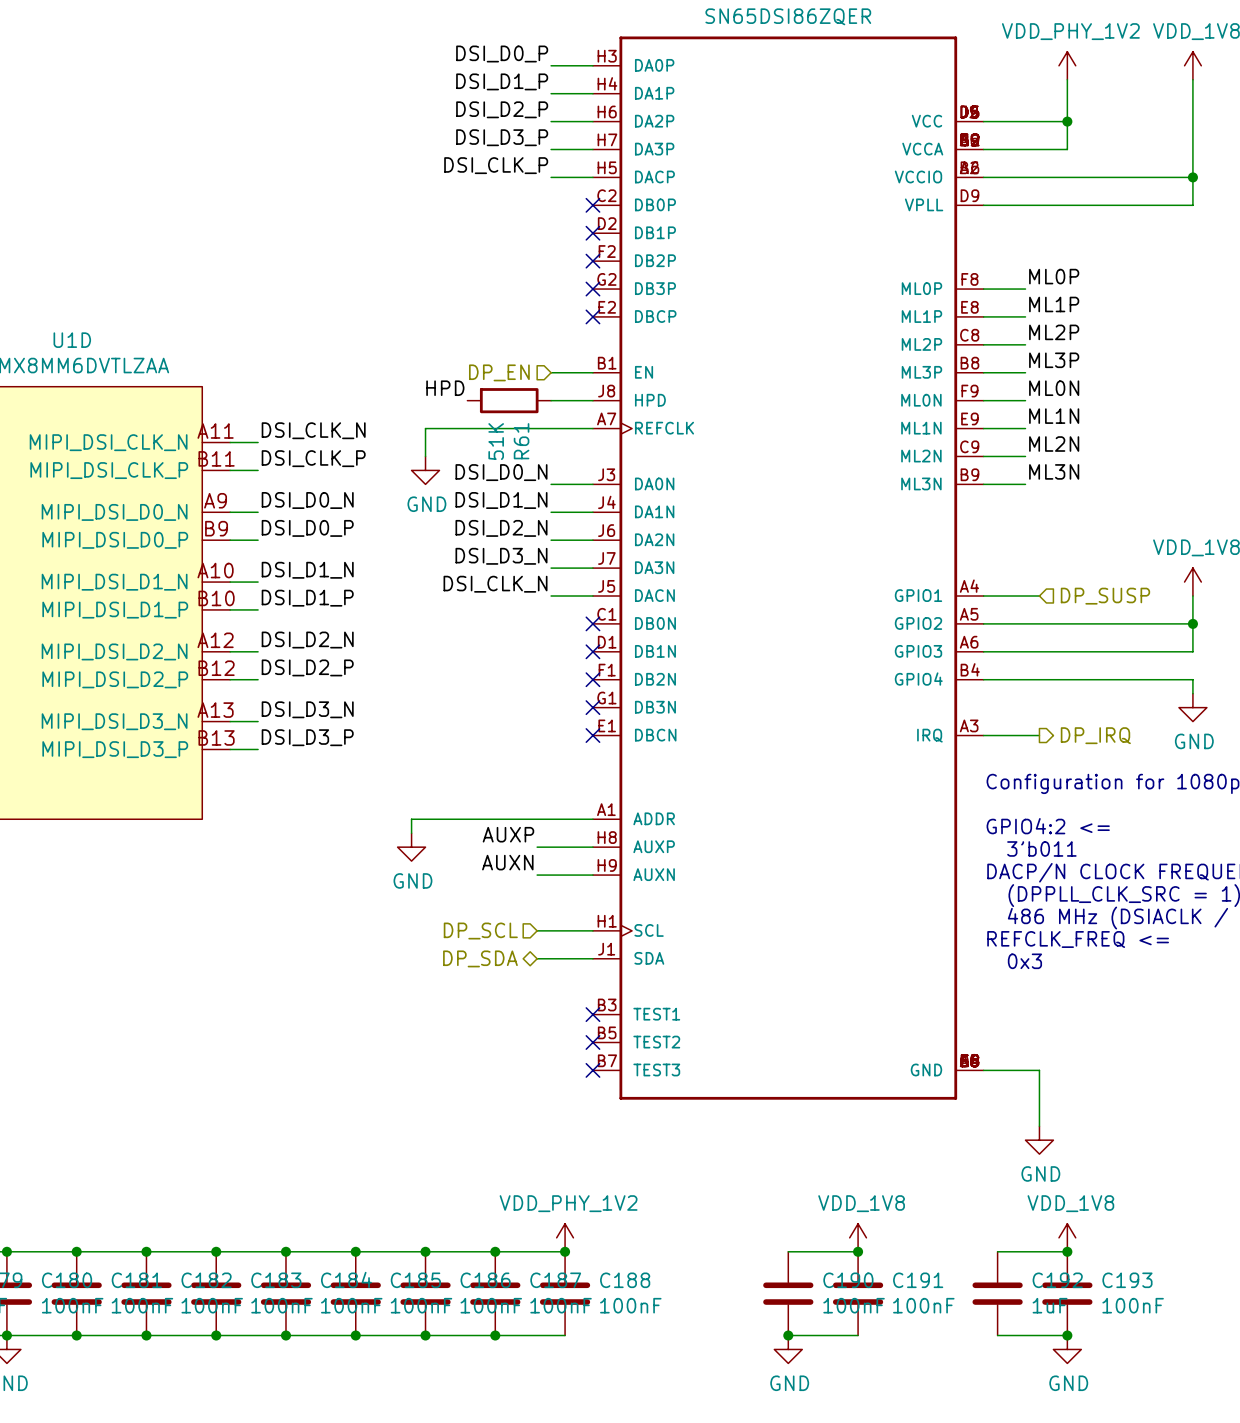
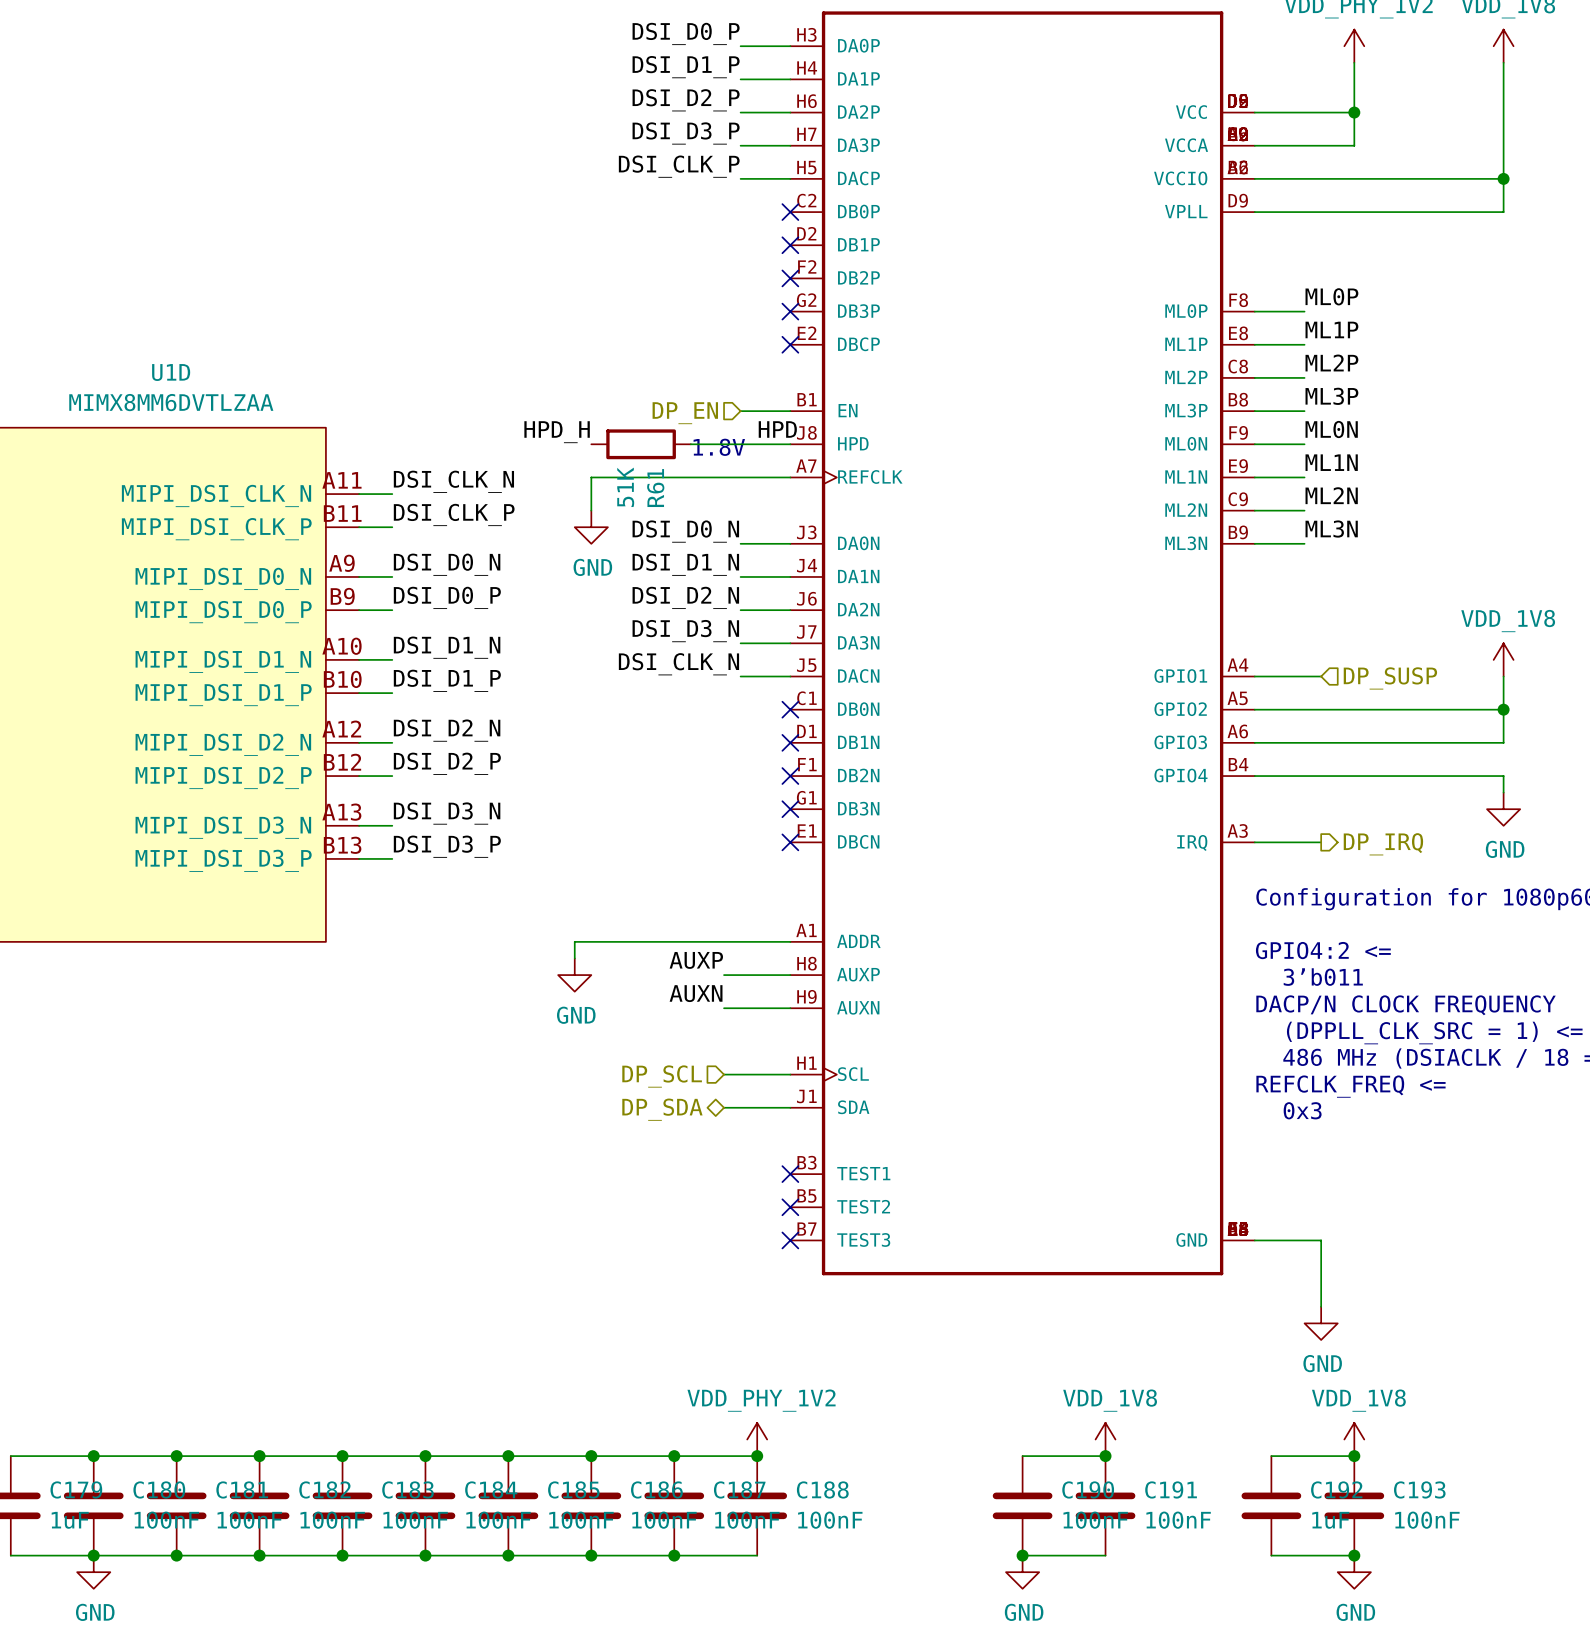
label: none -> HPD_H (557, 432)
label position: HPD (445, 388) -> HPD (777, 429)
wire: none -> (690, 444) (740, 444)
R61 position: (509, 400) -> (641, 444)
text: none -> 1.8V (719, 447)

